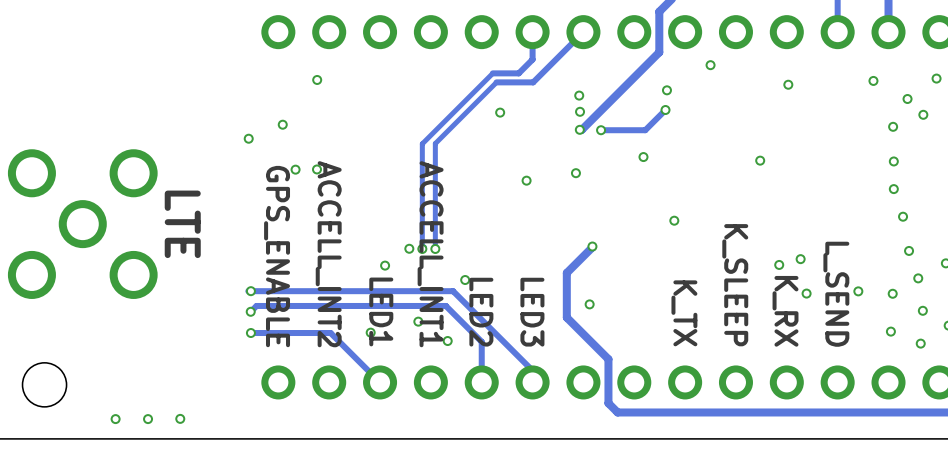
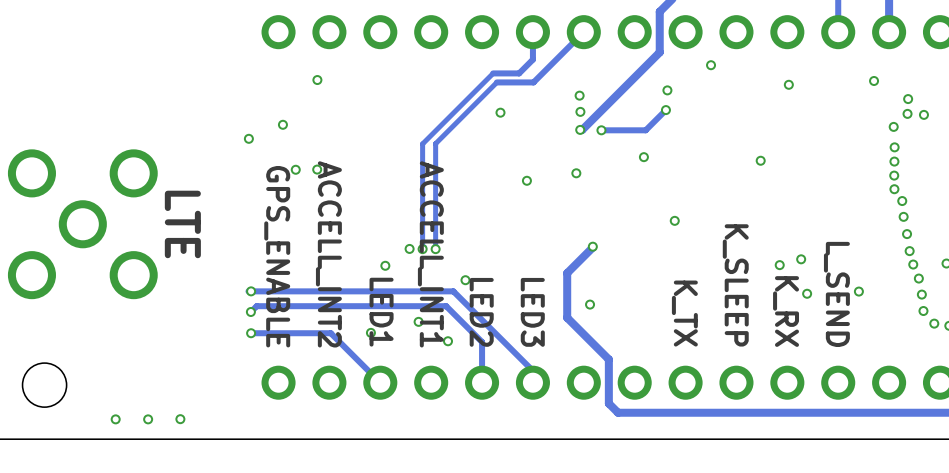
via: (936, 78) -> none
via: none -> (907, 113)
via: none -> (894, 147)
via: none -> (894, 175)
via: none -> (902, 201)
via: none -> (907, 234)
via: none -> (913, 264)
via: (892, 293) -> none
via: none -> (921, 294)
via: none -> (934, 323)
via: (890, 331) -> none
via: (920, 343) -> none

